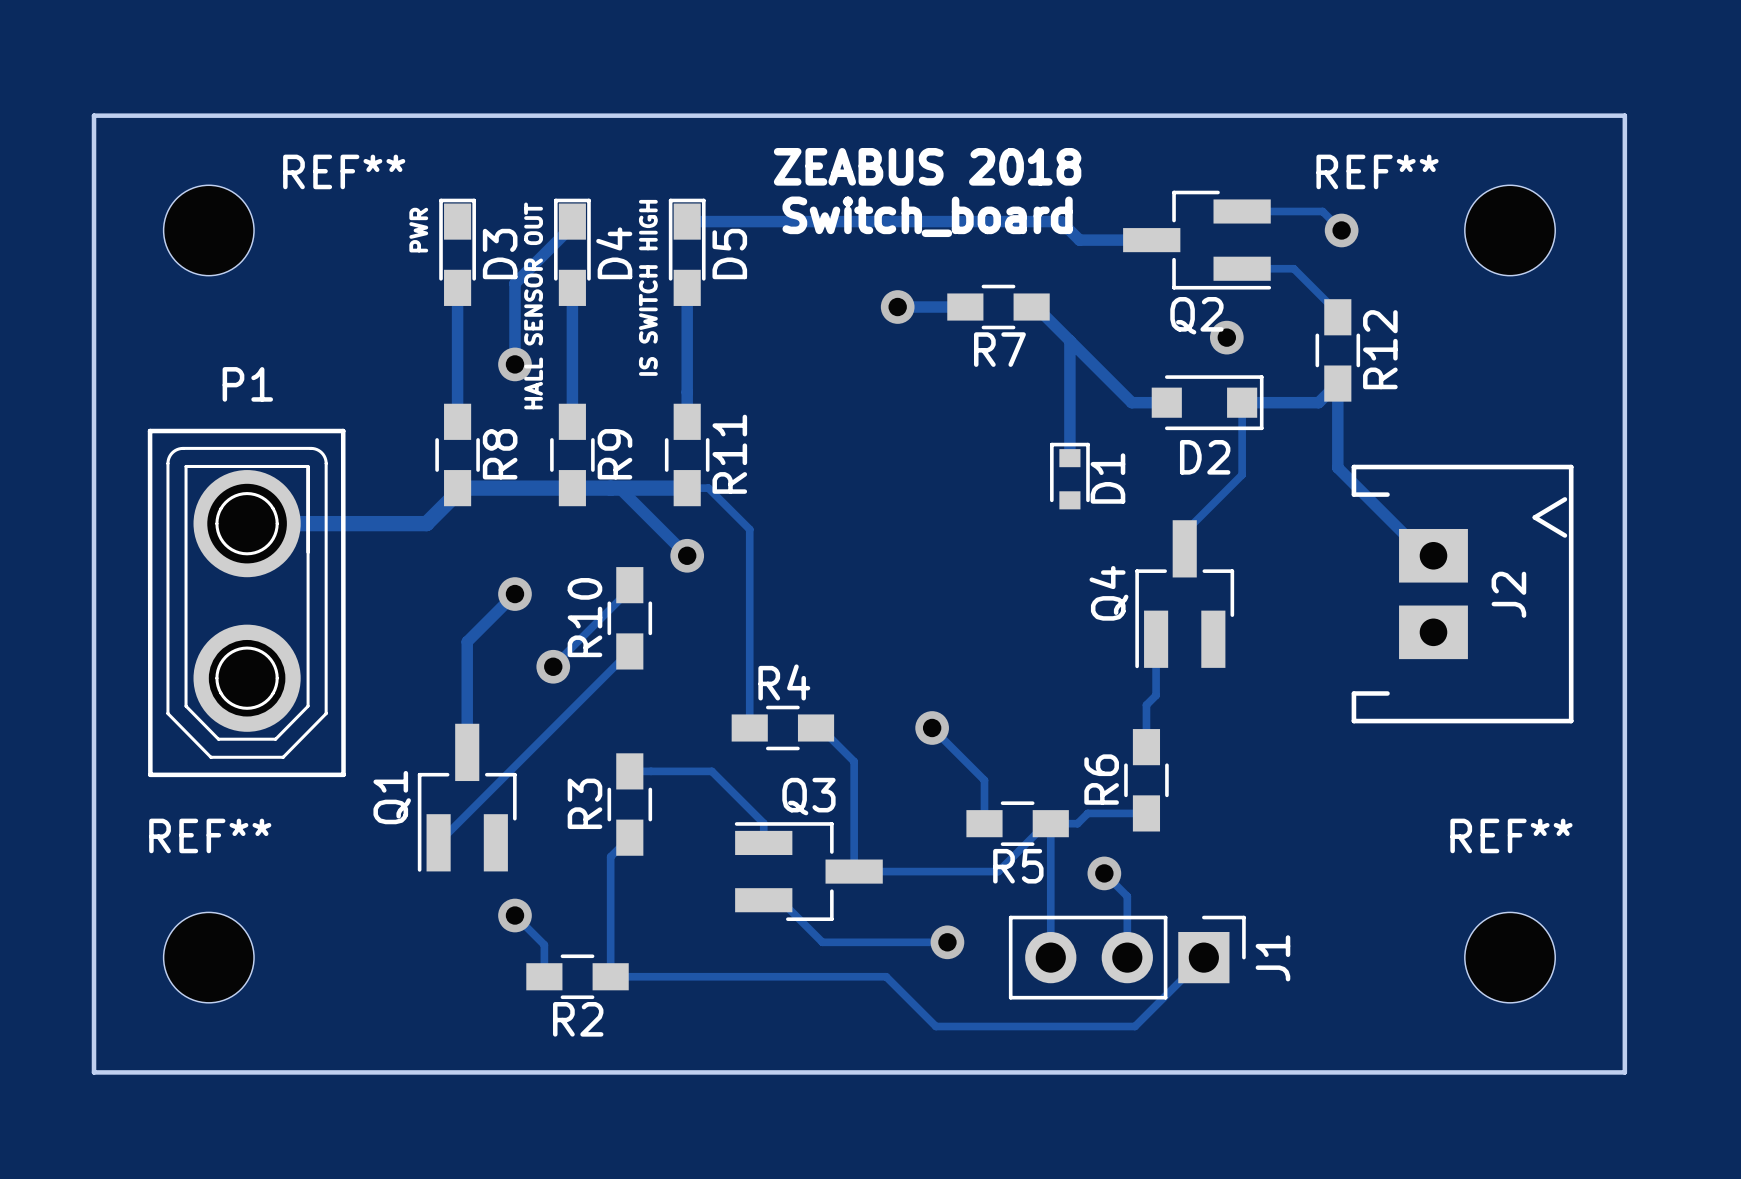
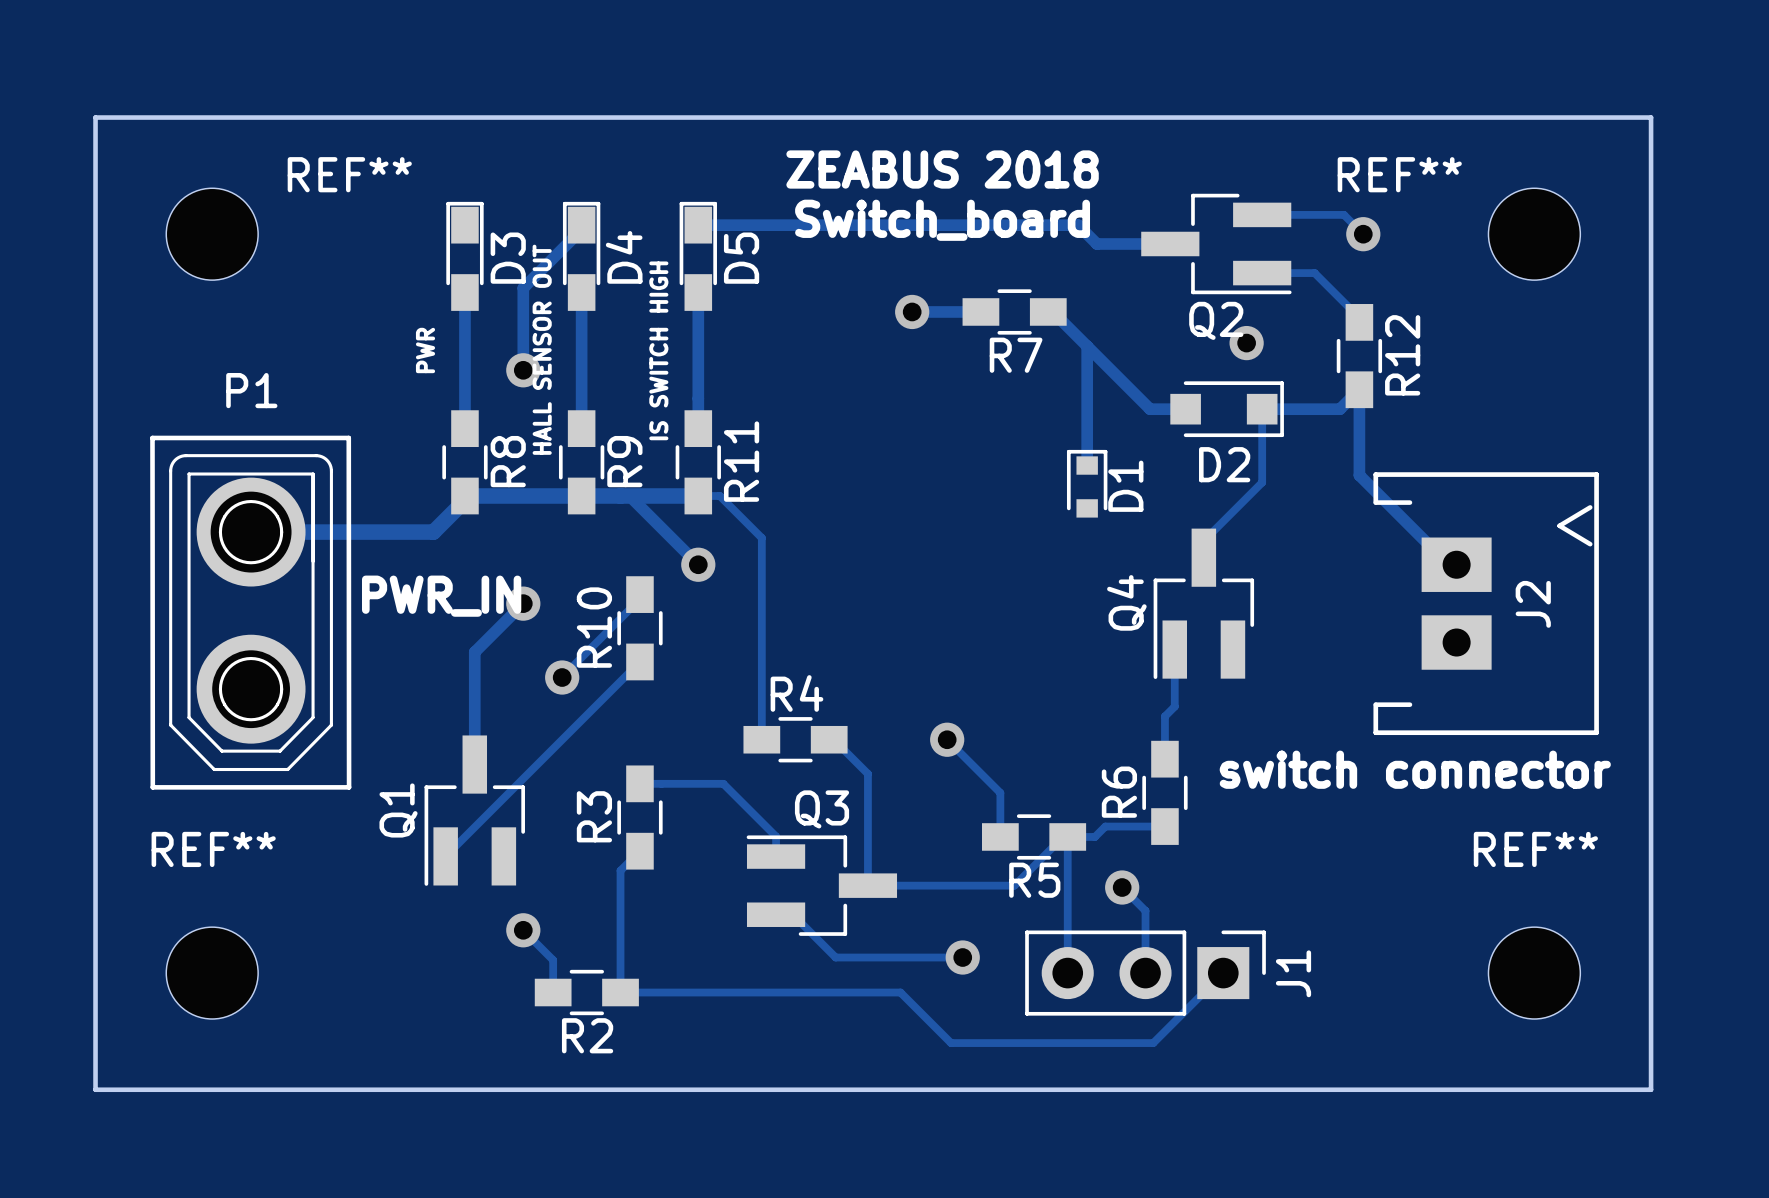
text position: PWR (418, 230) -> PWR (425, 350)
text position: IS SWITCH HIGH (648, 287) -> IS SWITCH HIGH (658, 350)
text position: HALL SENSOR OUT (533, 305) -> HALL SENSOR OUT (542, 349)
text: none -> PWR_IN (441, 596)
text: none -> switch connector (1415, 769)

